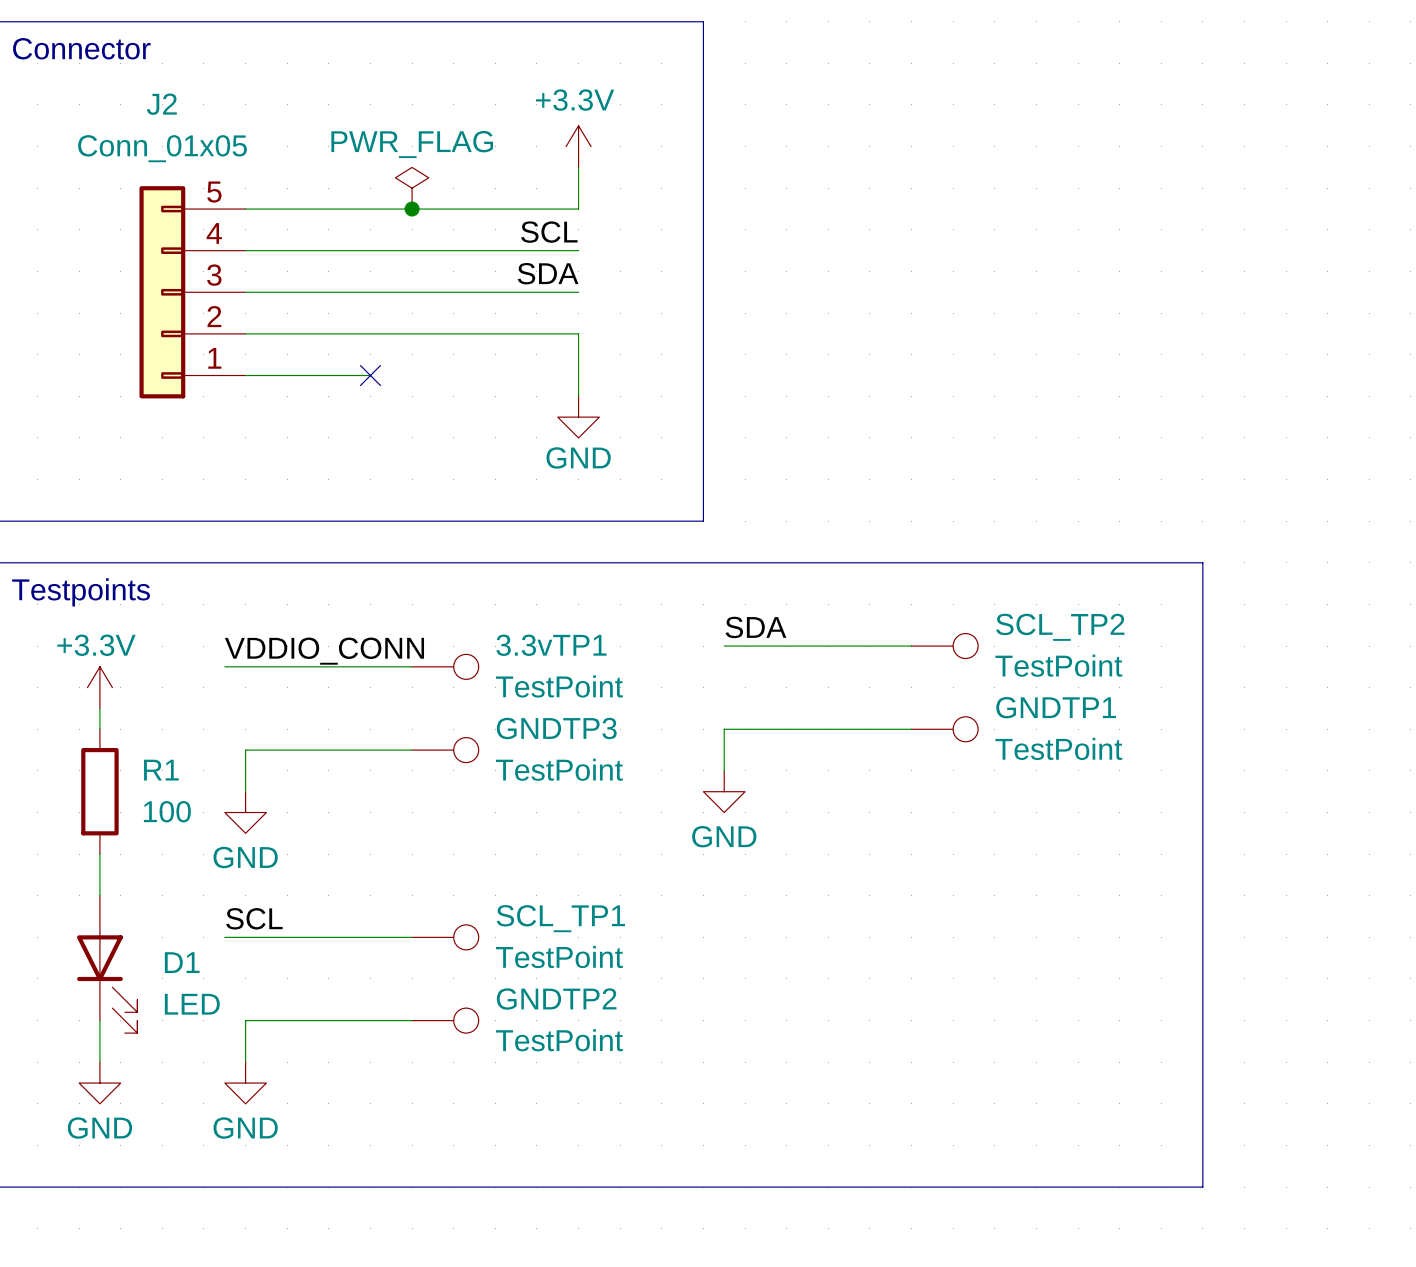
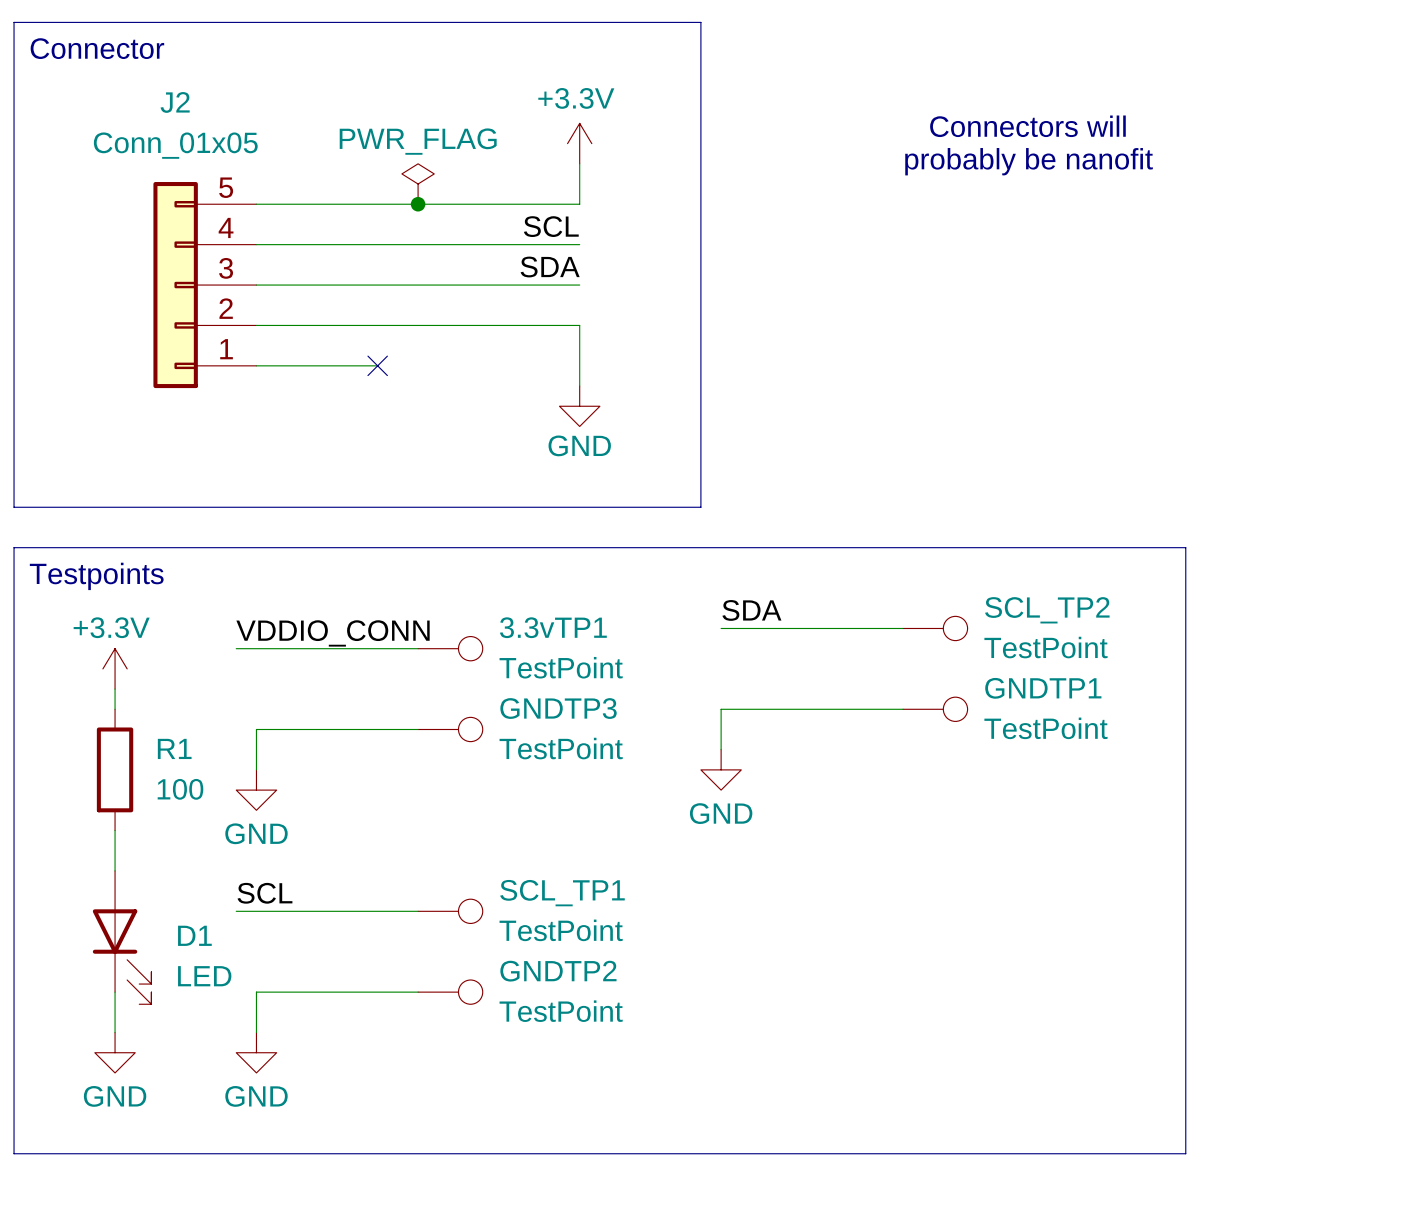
text: none -> Connectors will (1027, 126)
text: none -> probably be nanofit (1029, 161)

